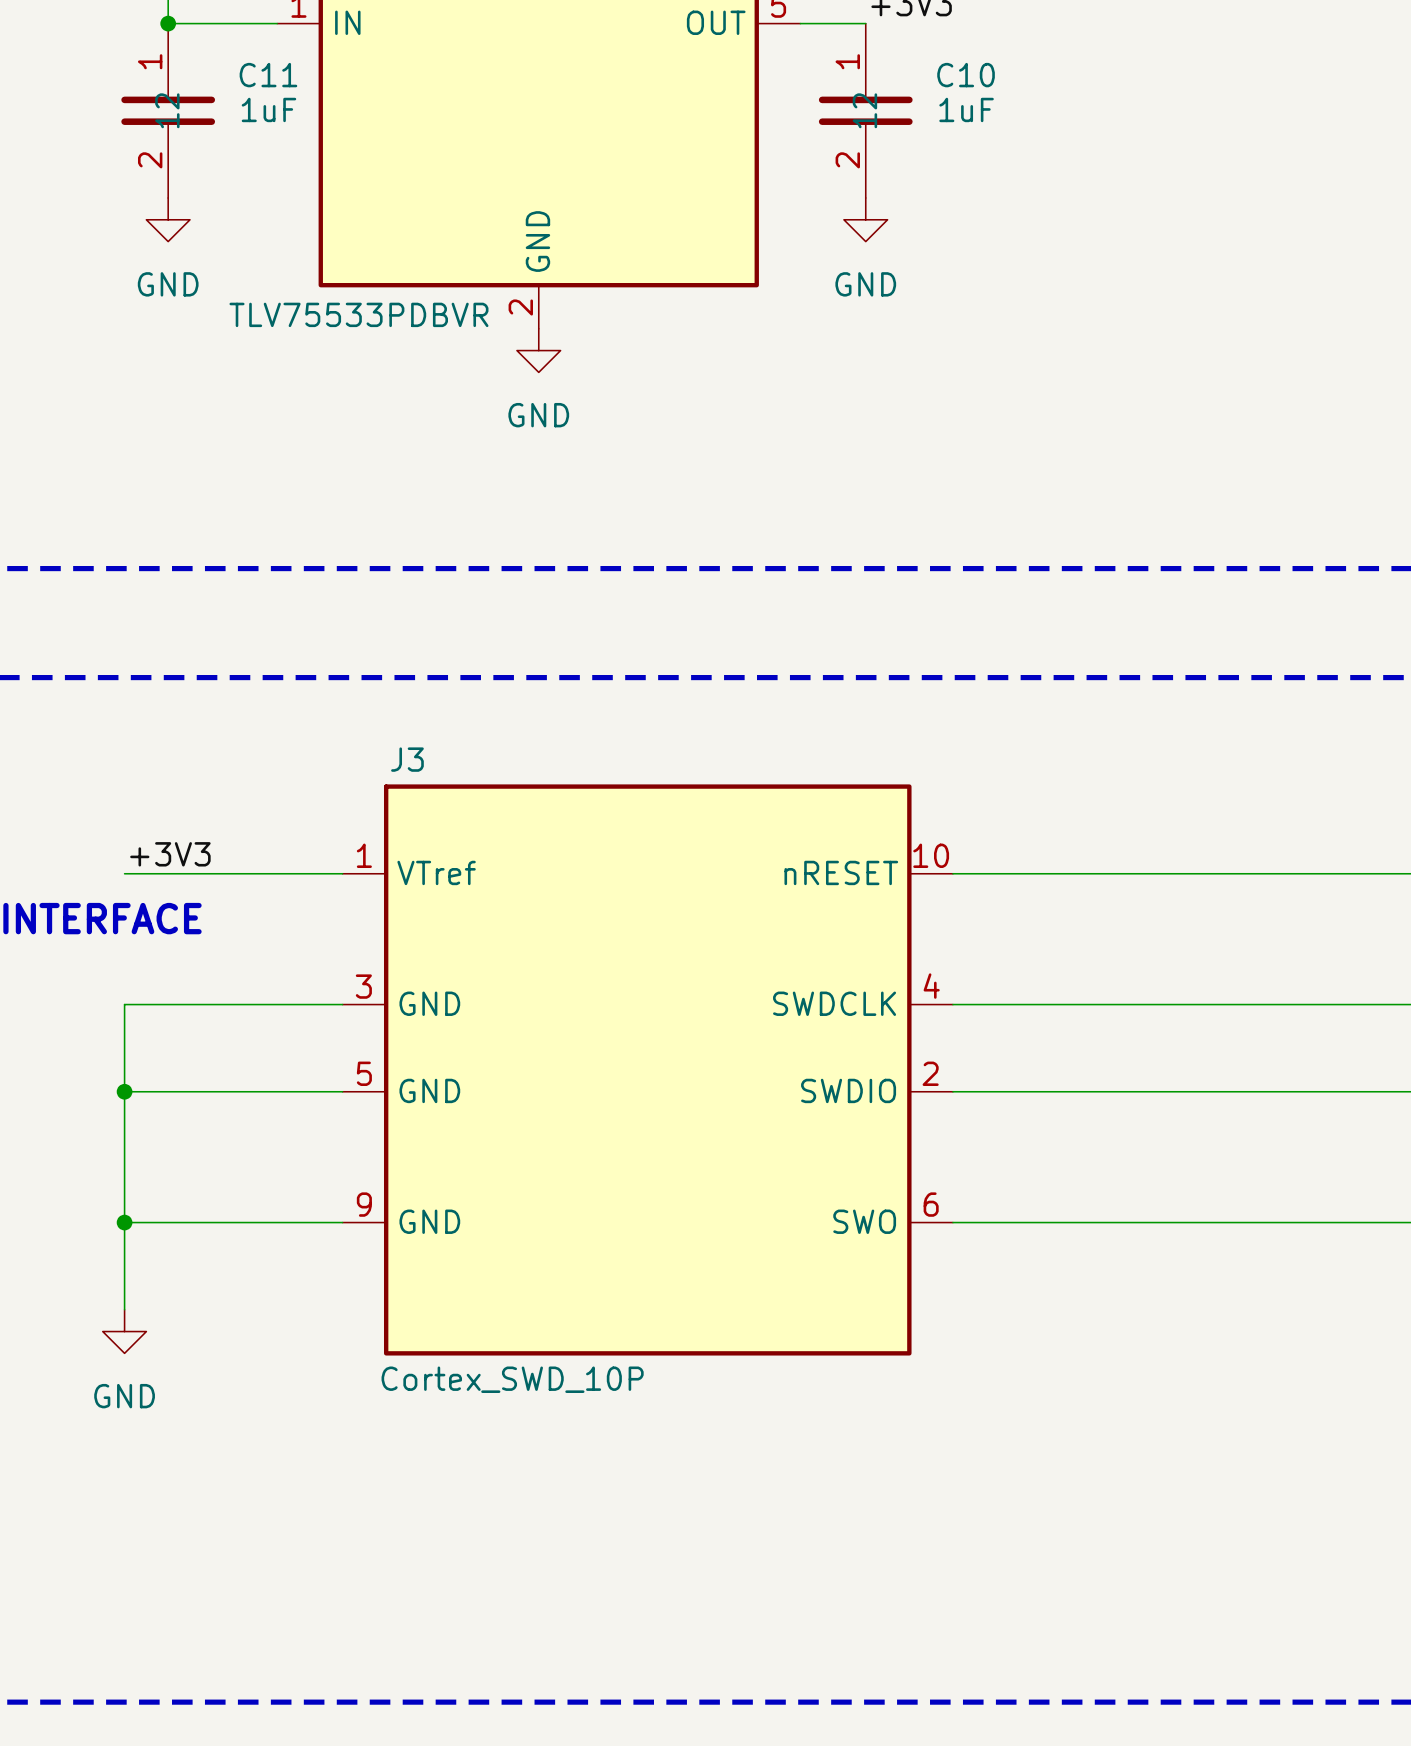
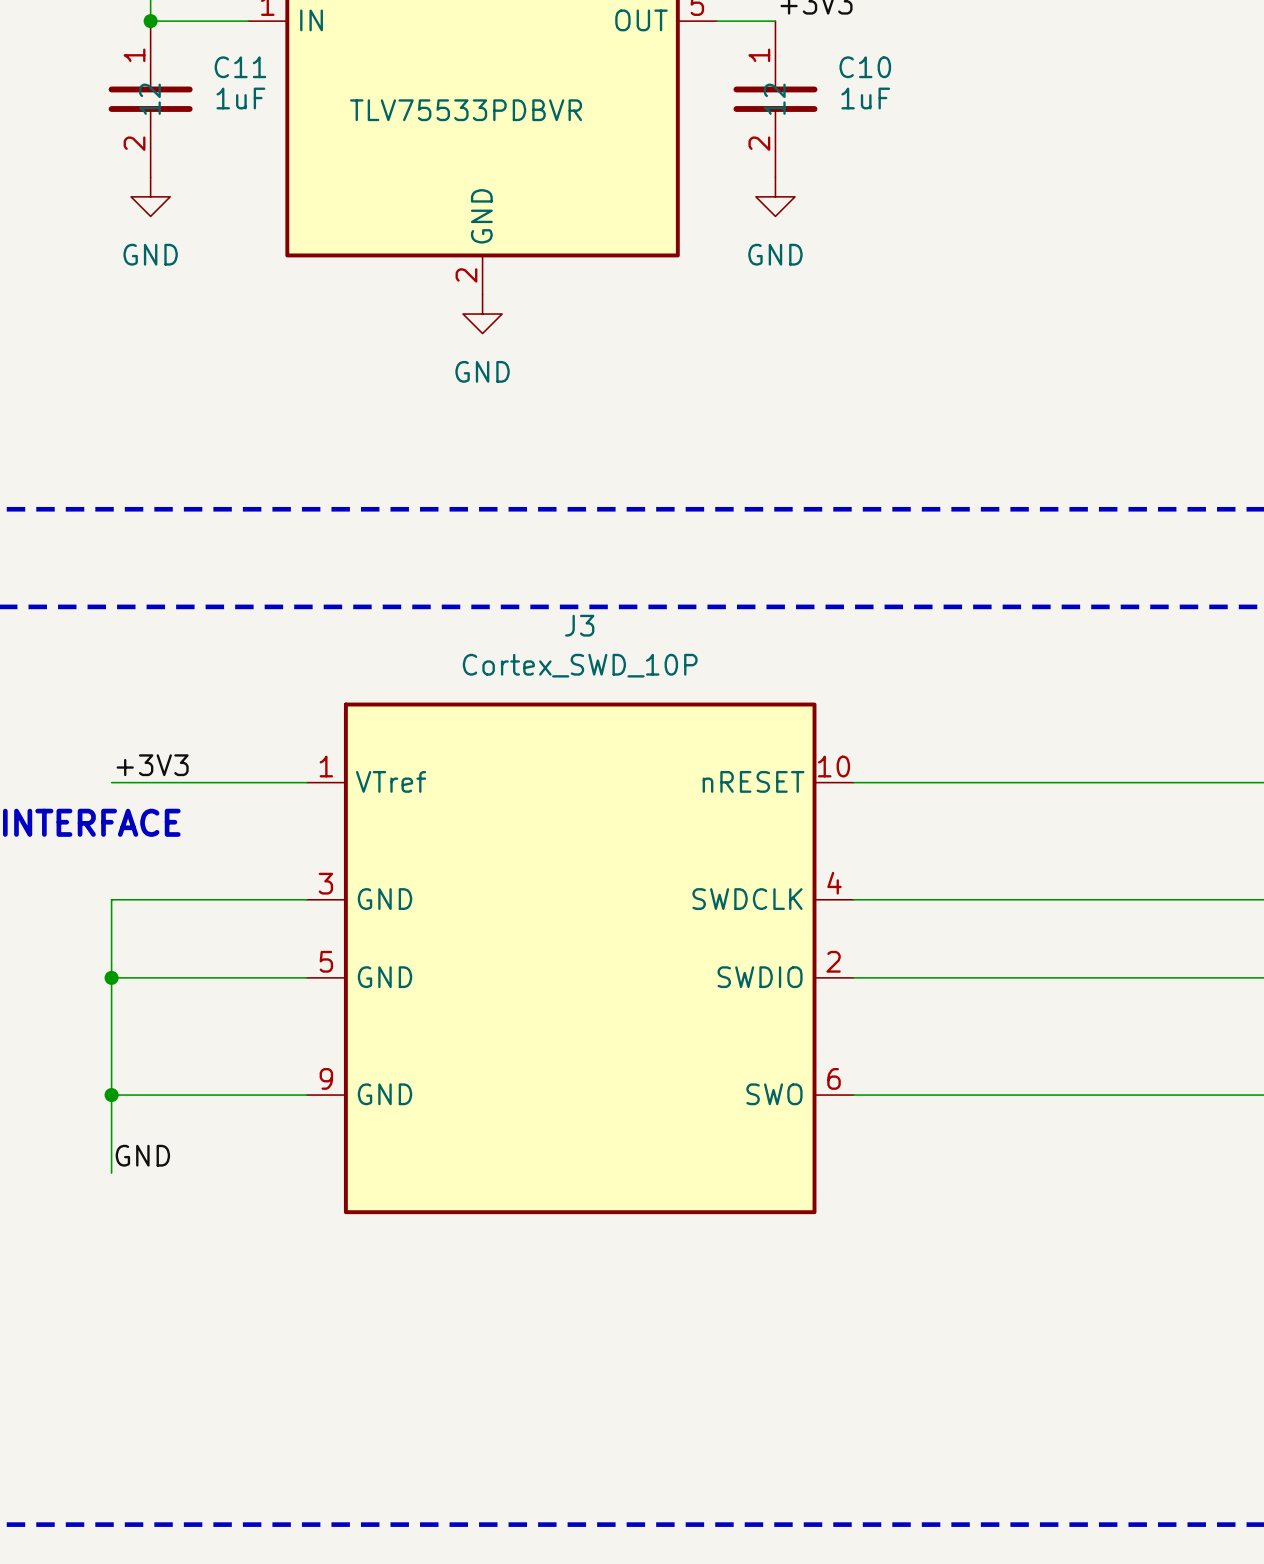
part value position: TLV75533PDBVR (358, 314) -> TLV75533PDBVR (466, 110)
J3 name position: J3 (407, 759) -> J3 (579, 625)
label: none -> GND (142, 1155)
power symbol: GND (124, 1331) -> none
J3 value position: Cortex_SWD_10P (512, 1379) -> Cortex_SWD_10P (580, 665)

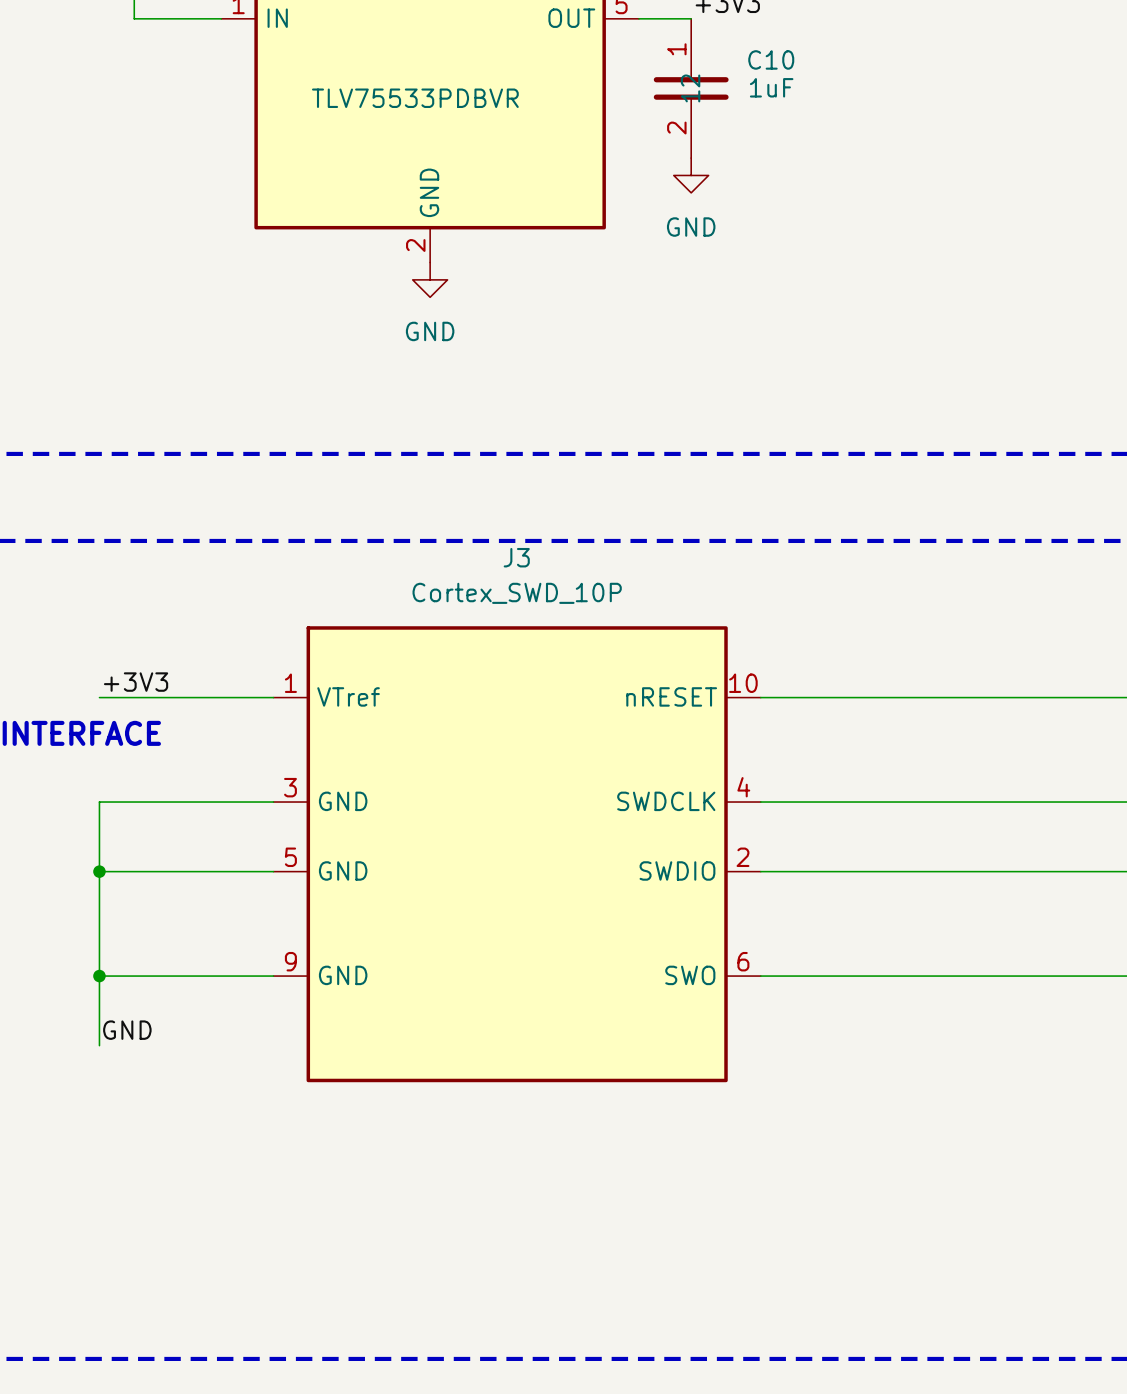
junction: (150, 21) -> none
C11: 1uF (150, 99) -> none
power symbol: GND (150, 196) -> none

